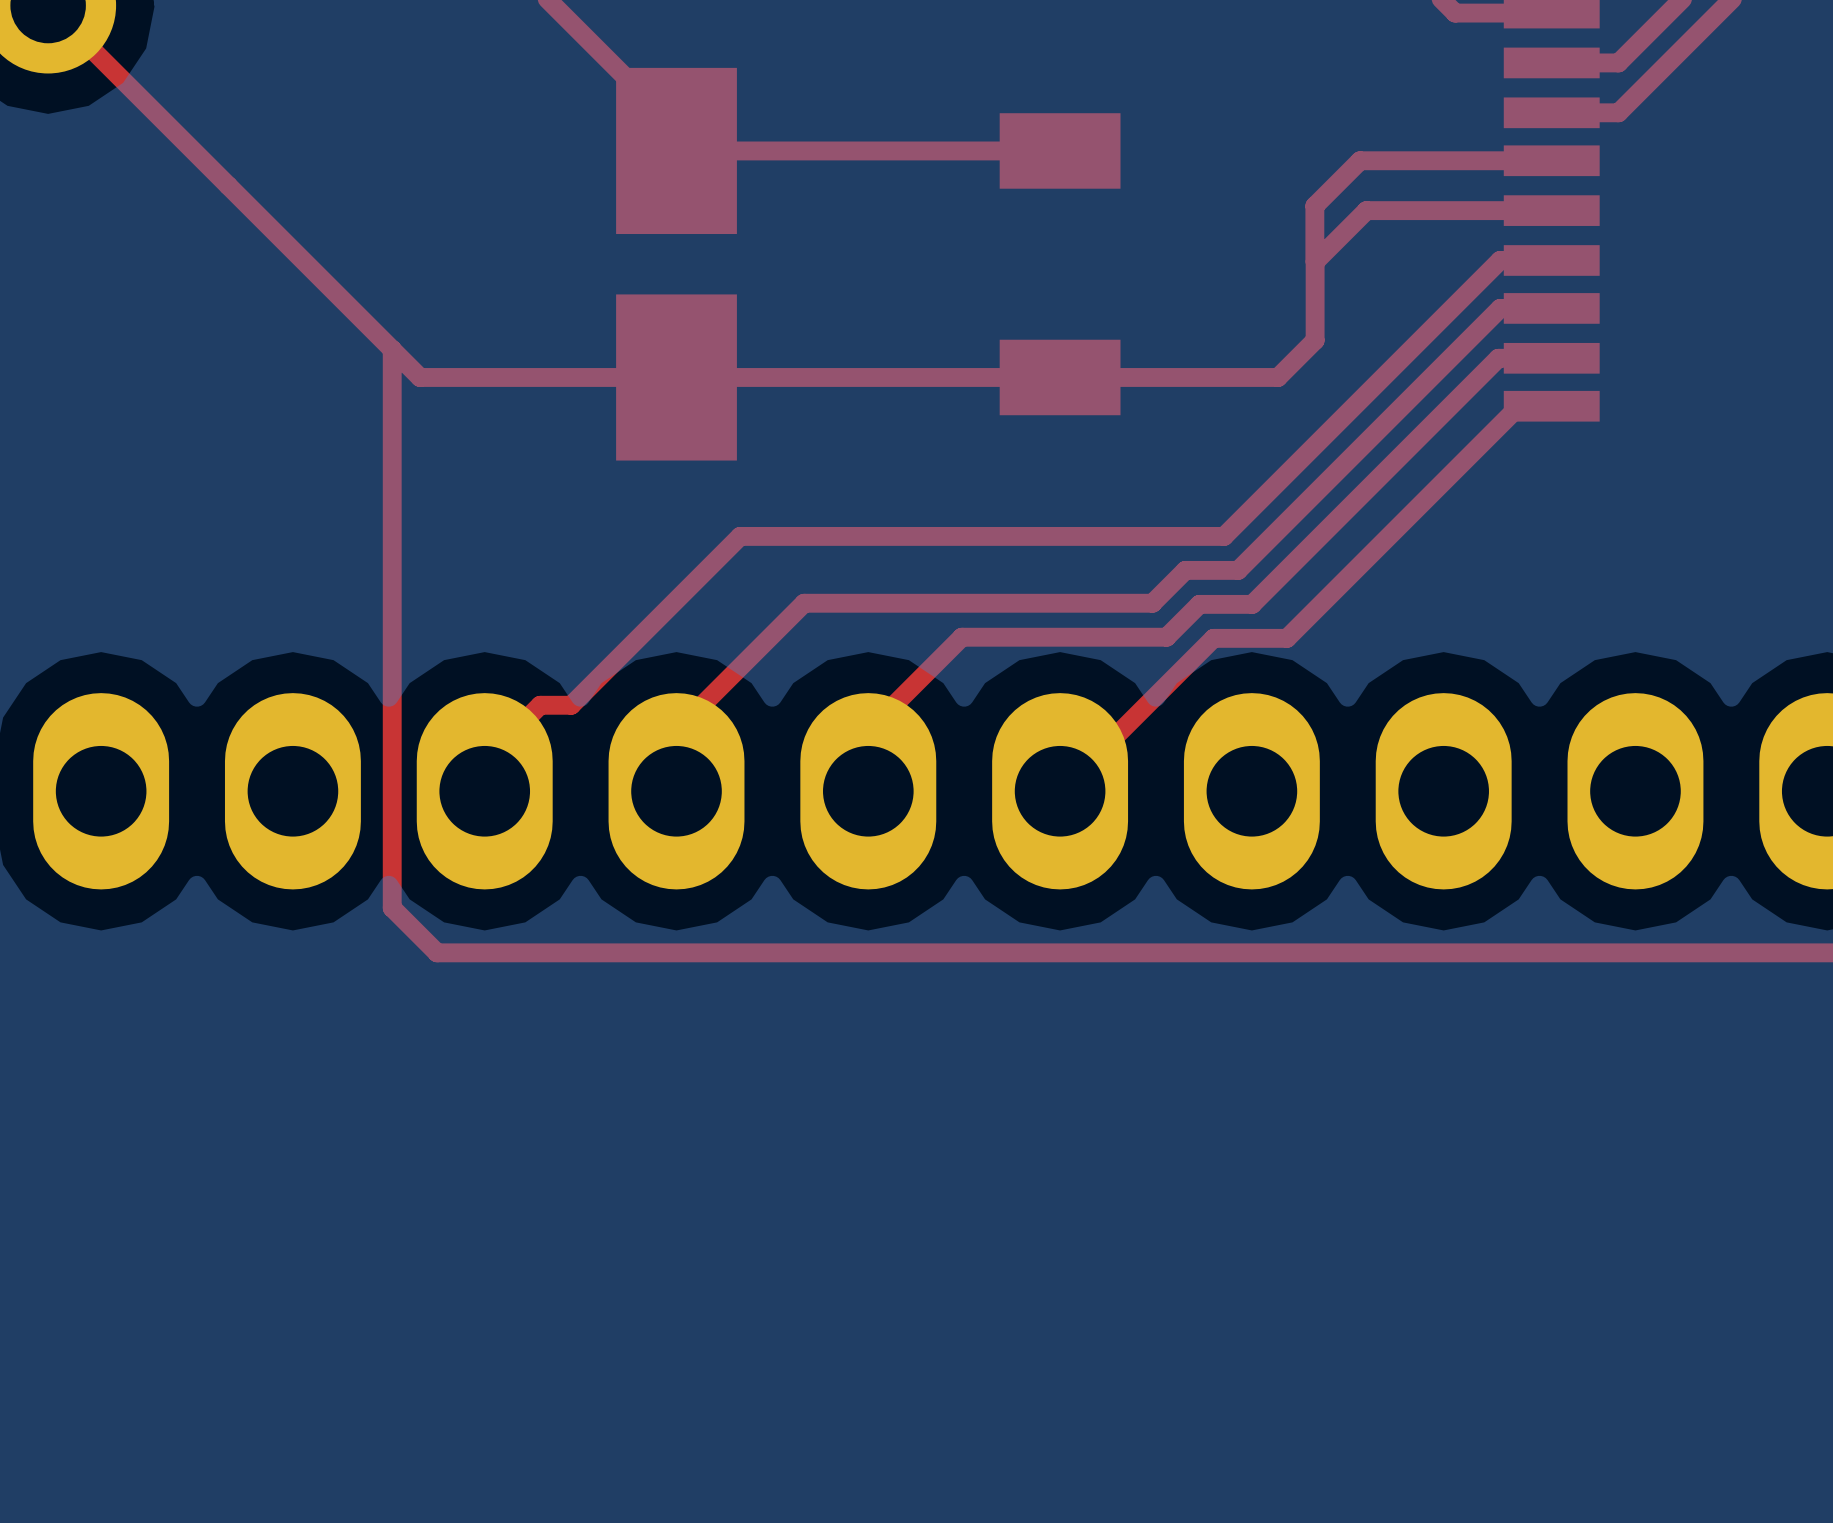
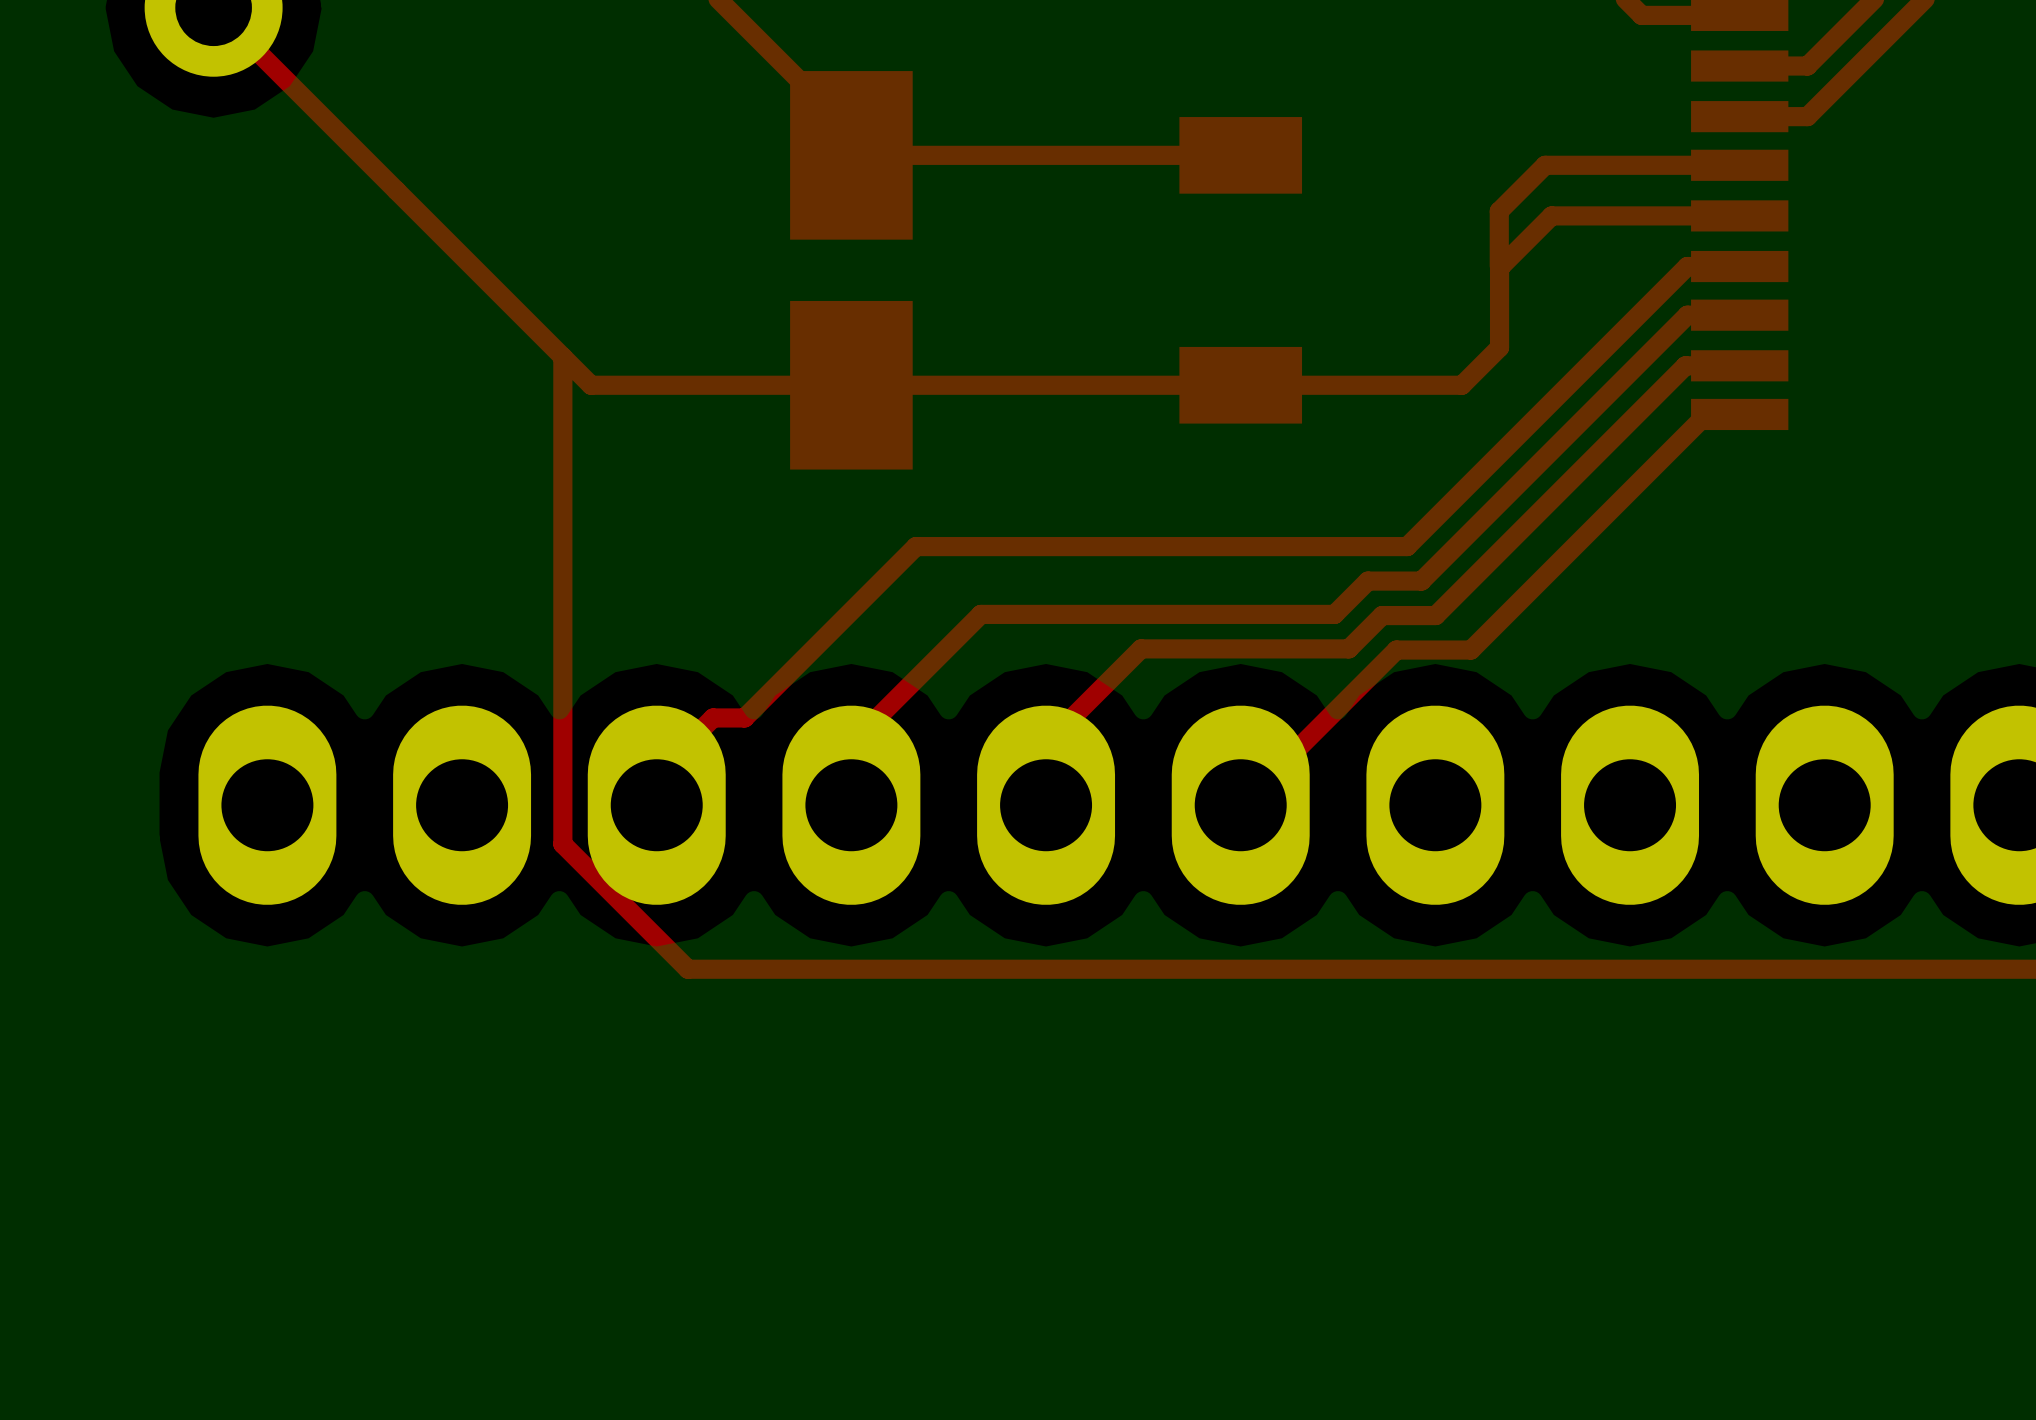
top track: (392, 829) (392, 907) (437, 952) (515, 952) -> (562, 844) (687, 969)

